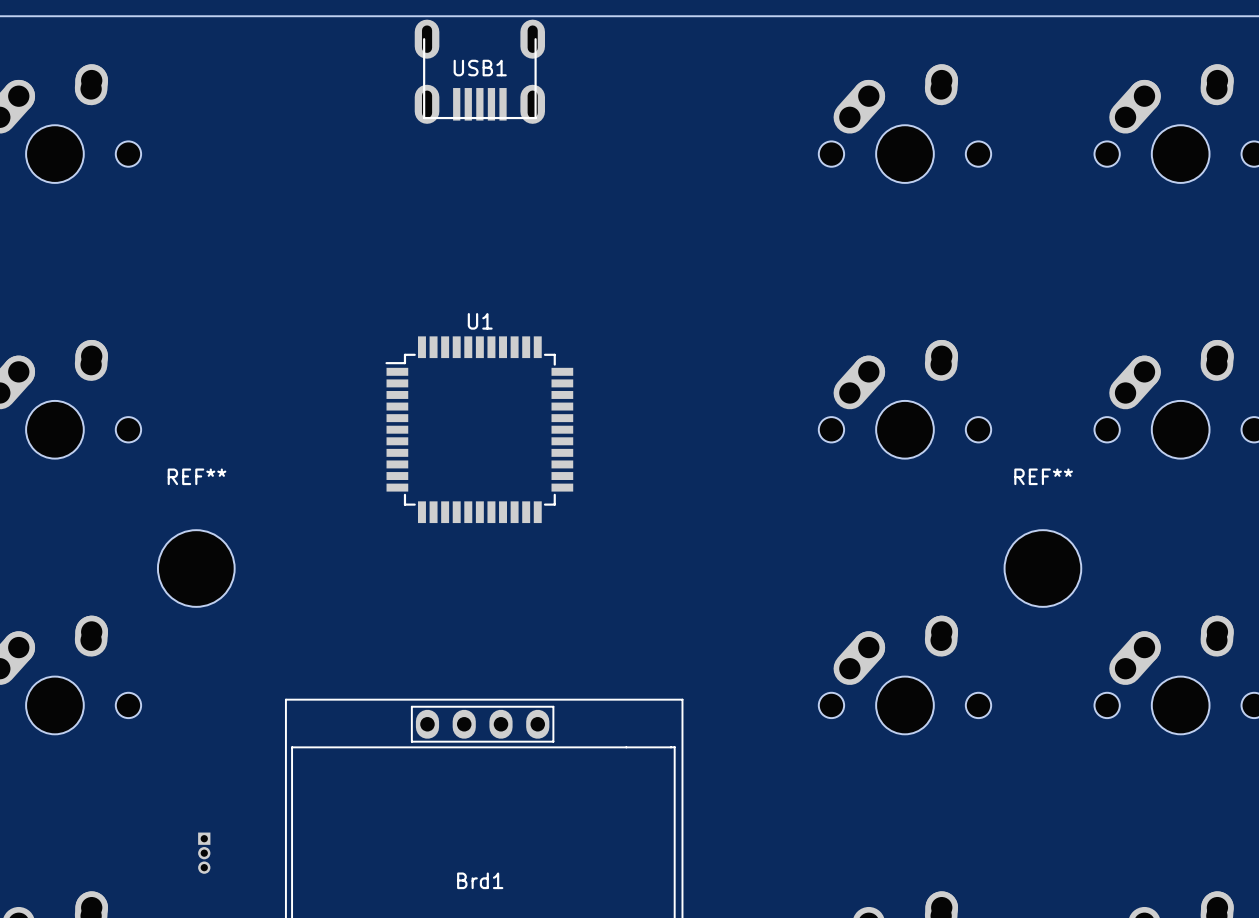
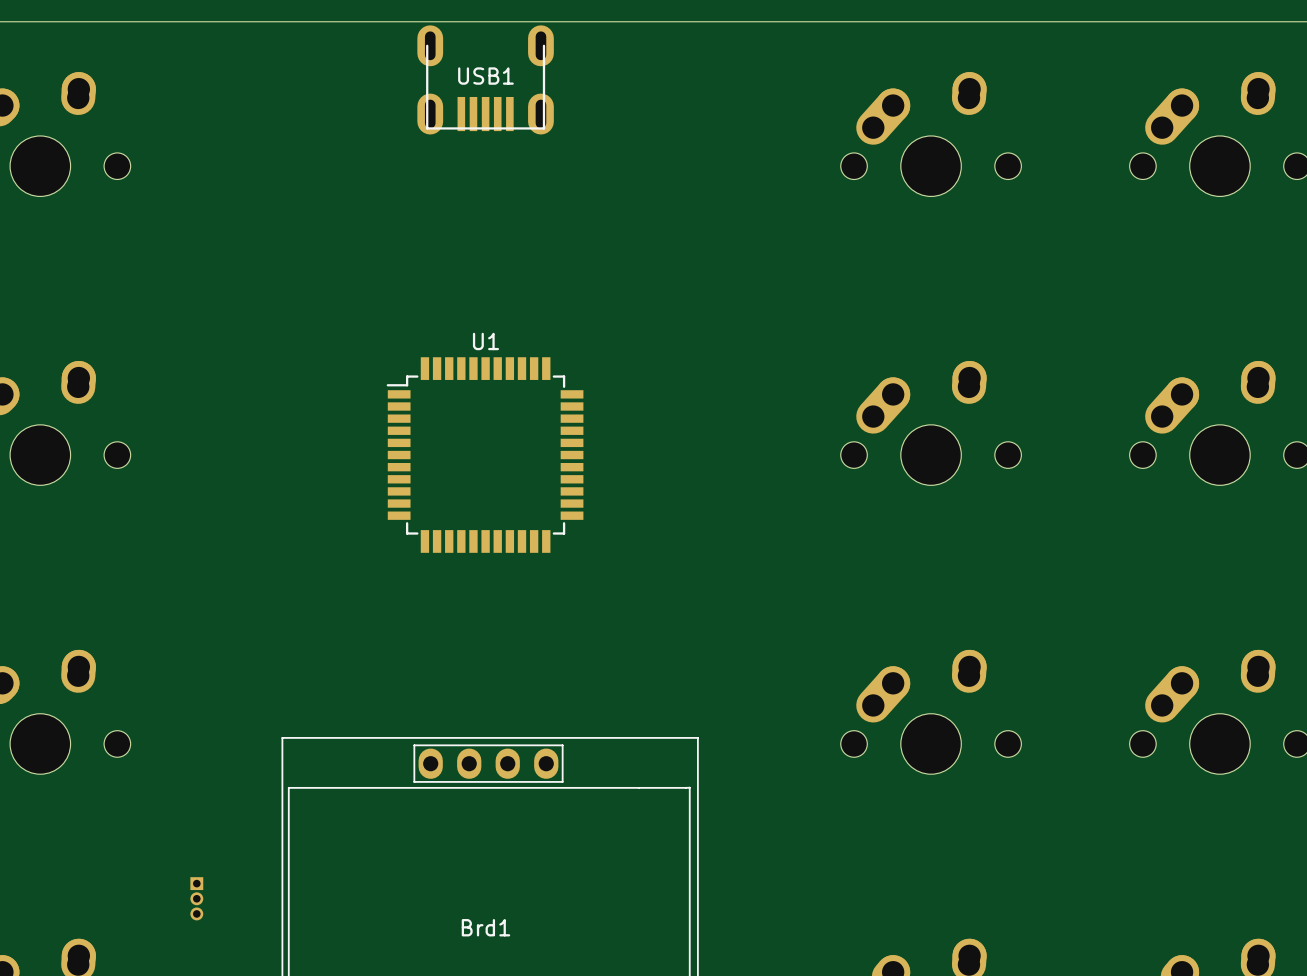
REF**: (196, 568) -> none
REF**: (1042, 568) -> none

